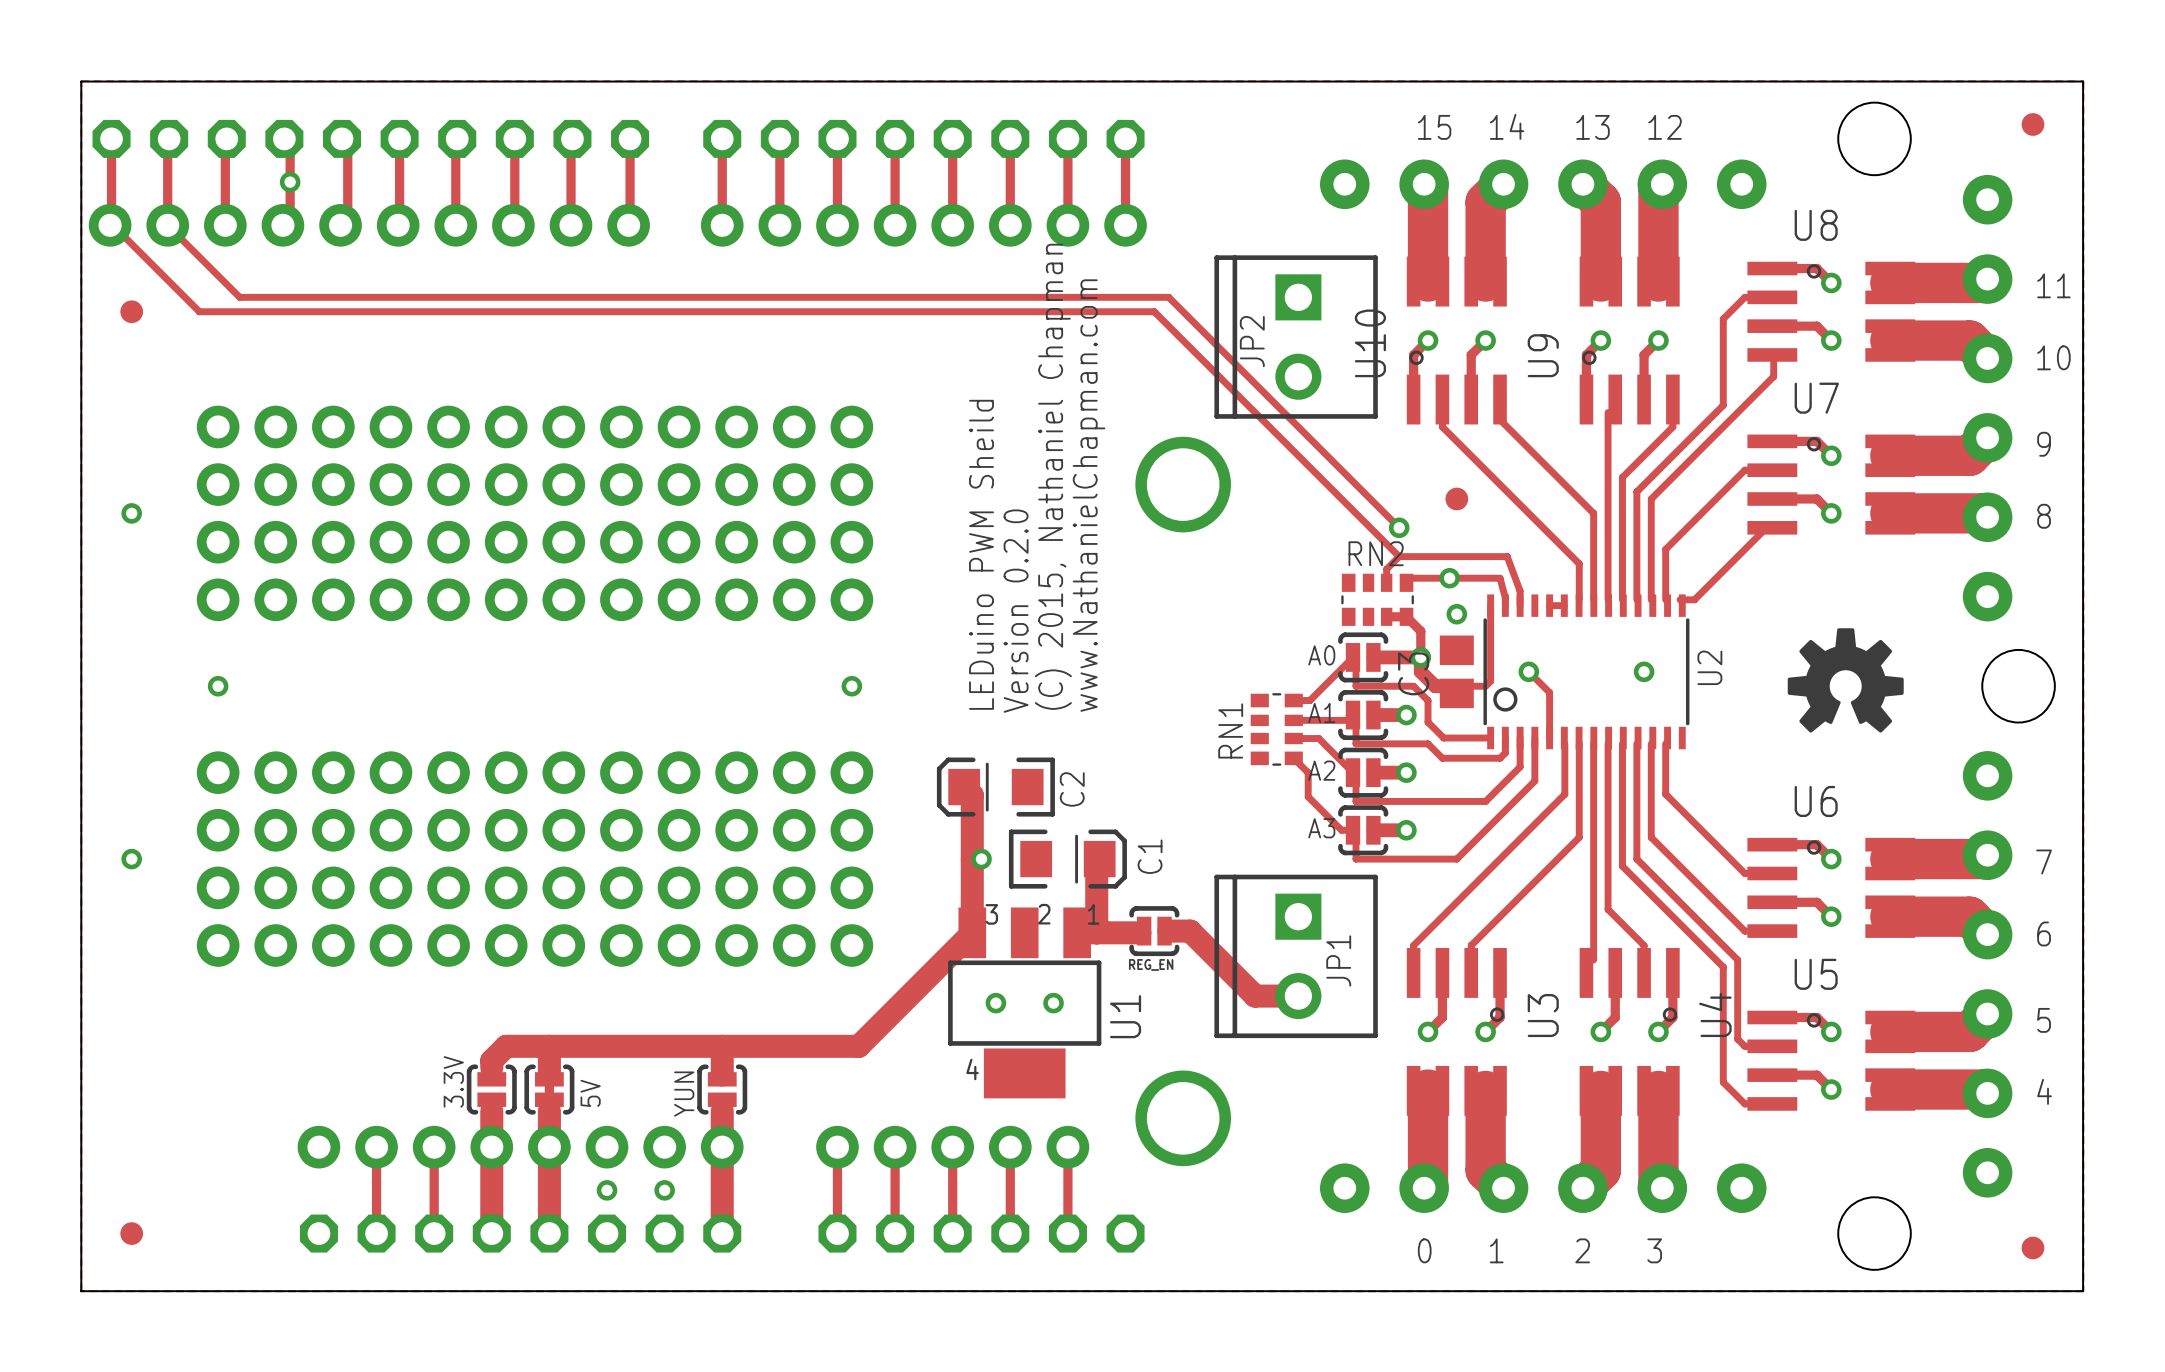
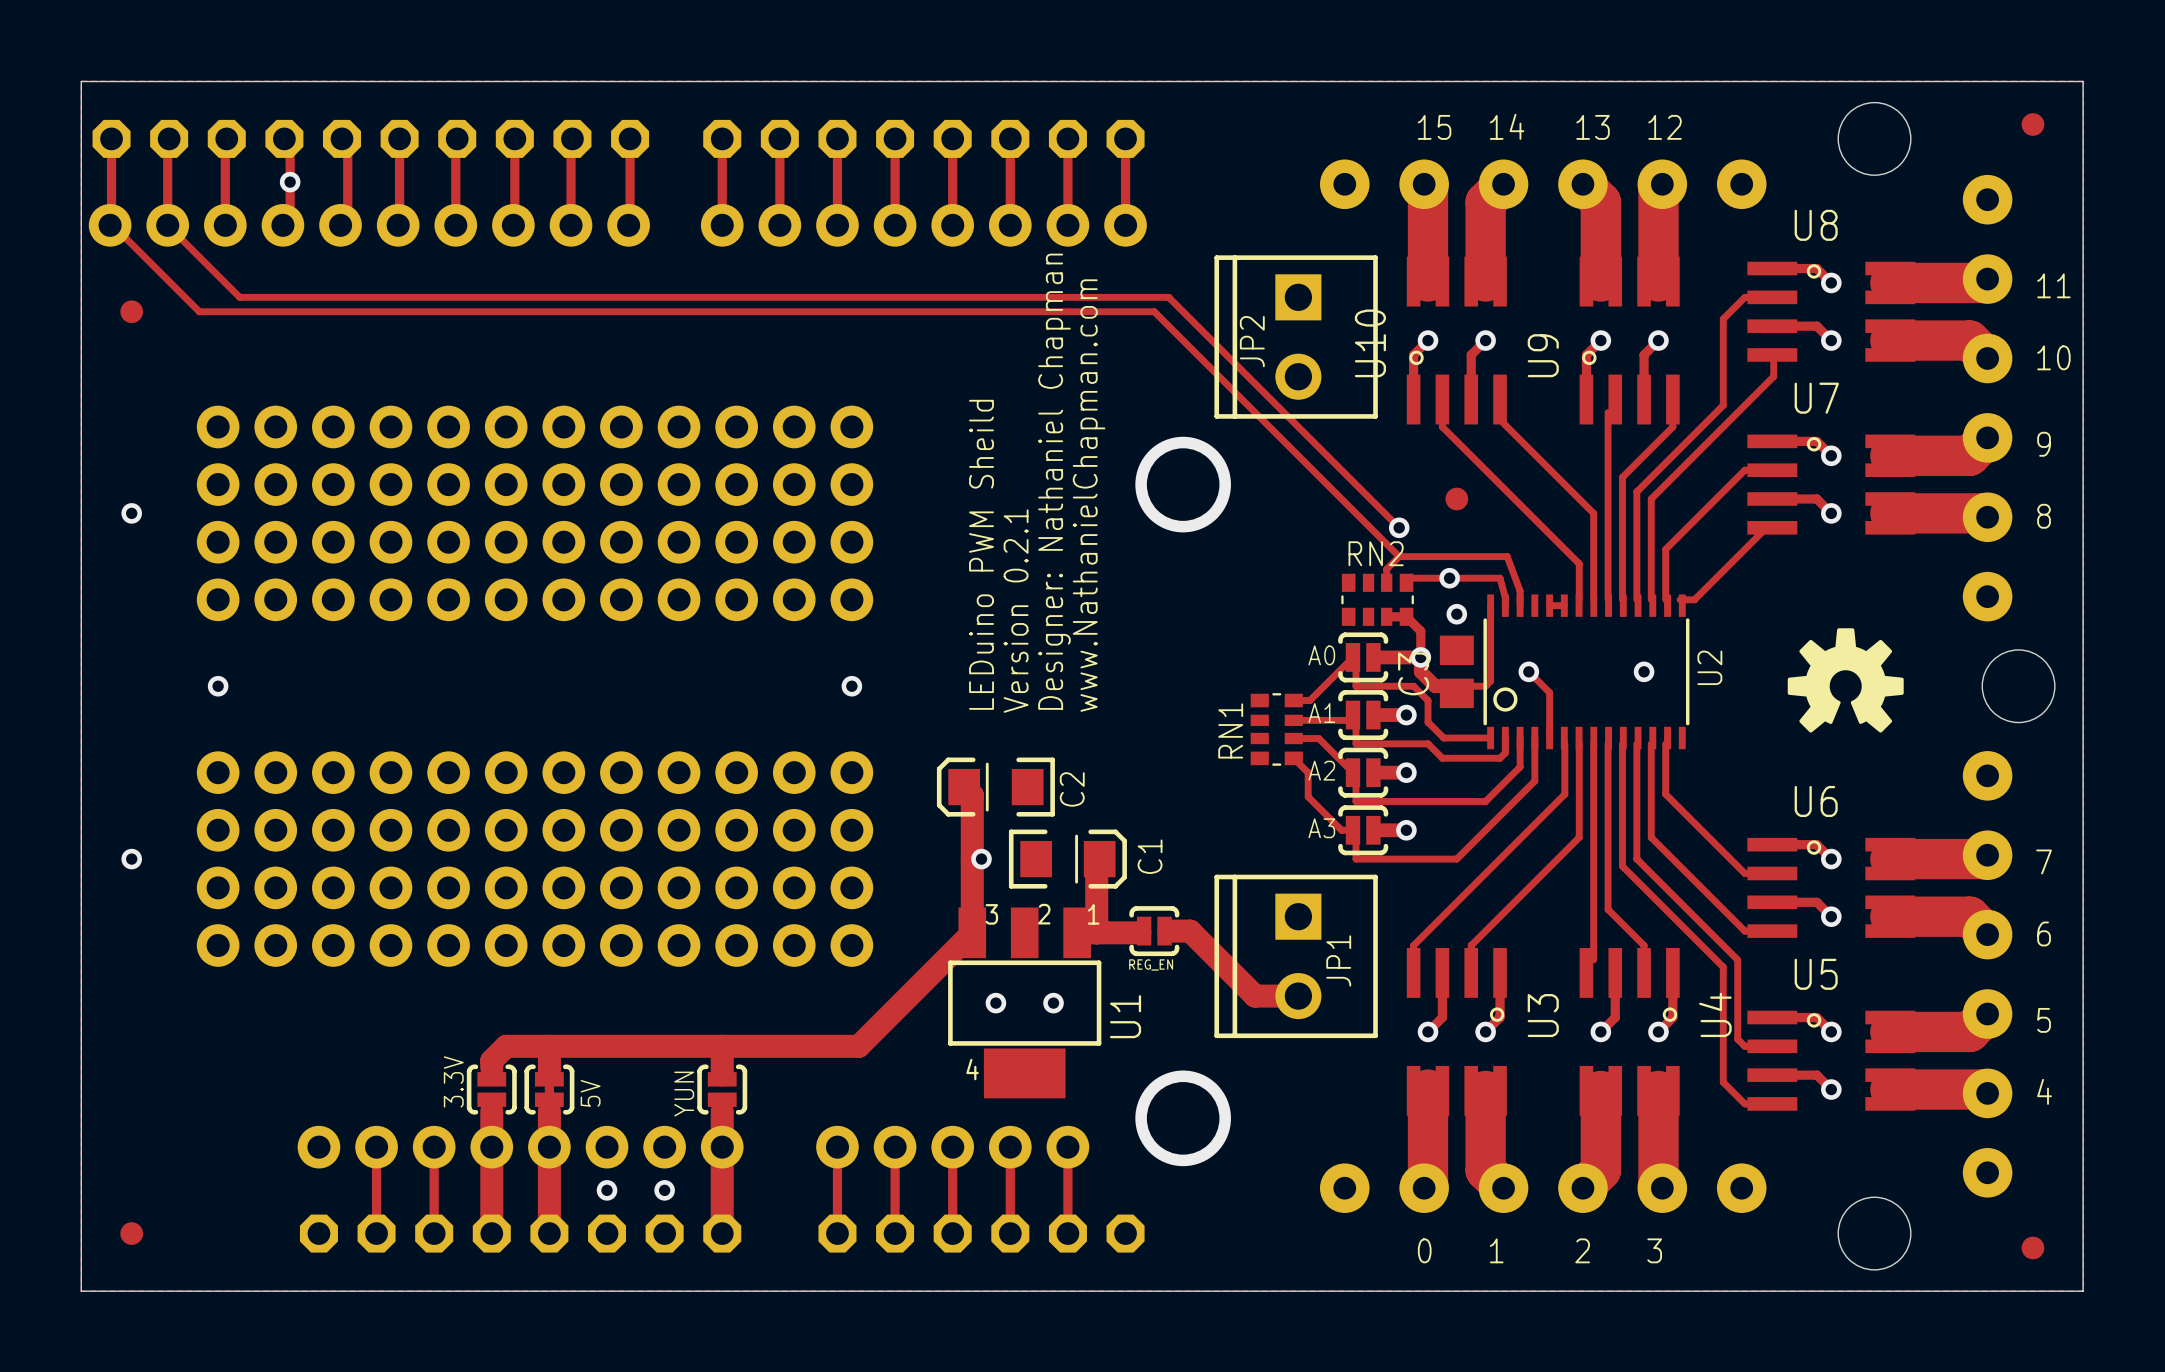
text: (C) 2015, Nathaniel Chapman (1053, 476) -> Designer: Nathaniel Chapman (1054, 481)
text: Version 0.2.0 (1016, 611) -> Version 0.2.1 (1016, 611)

